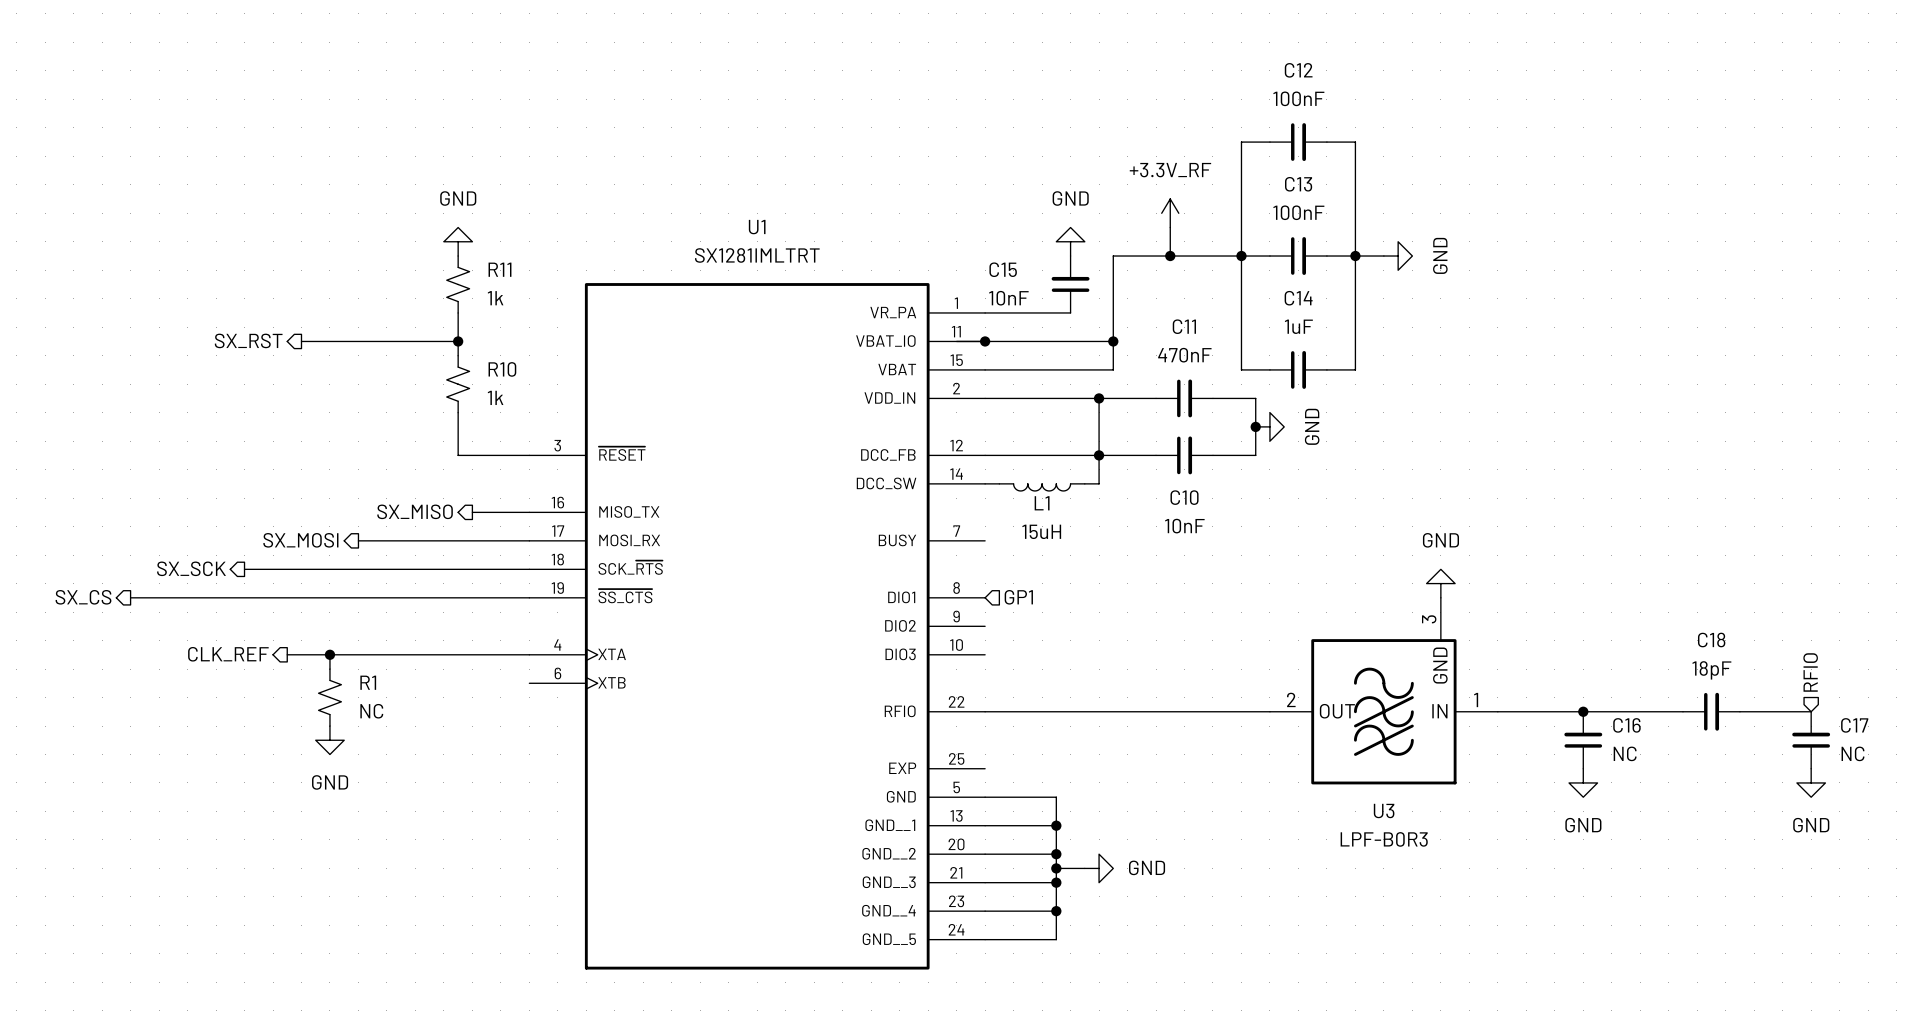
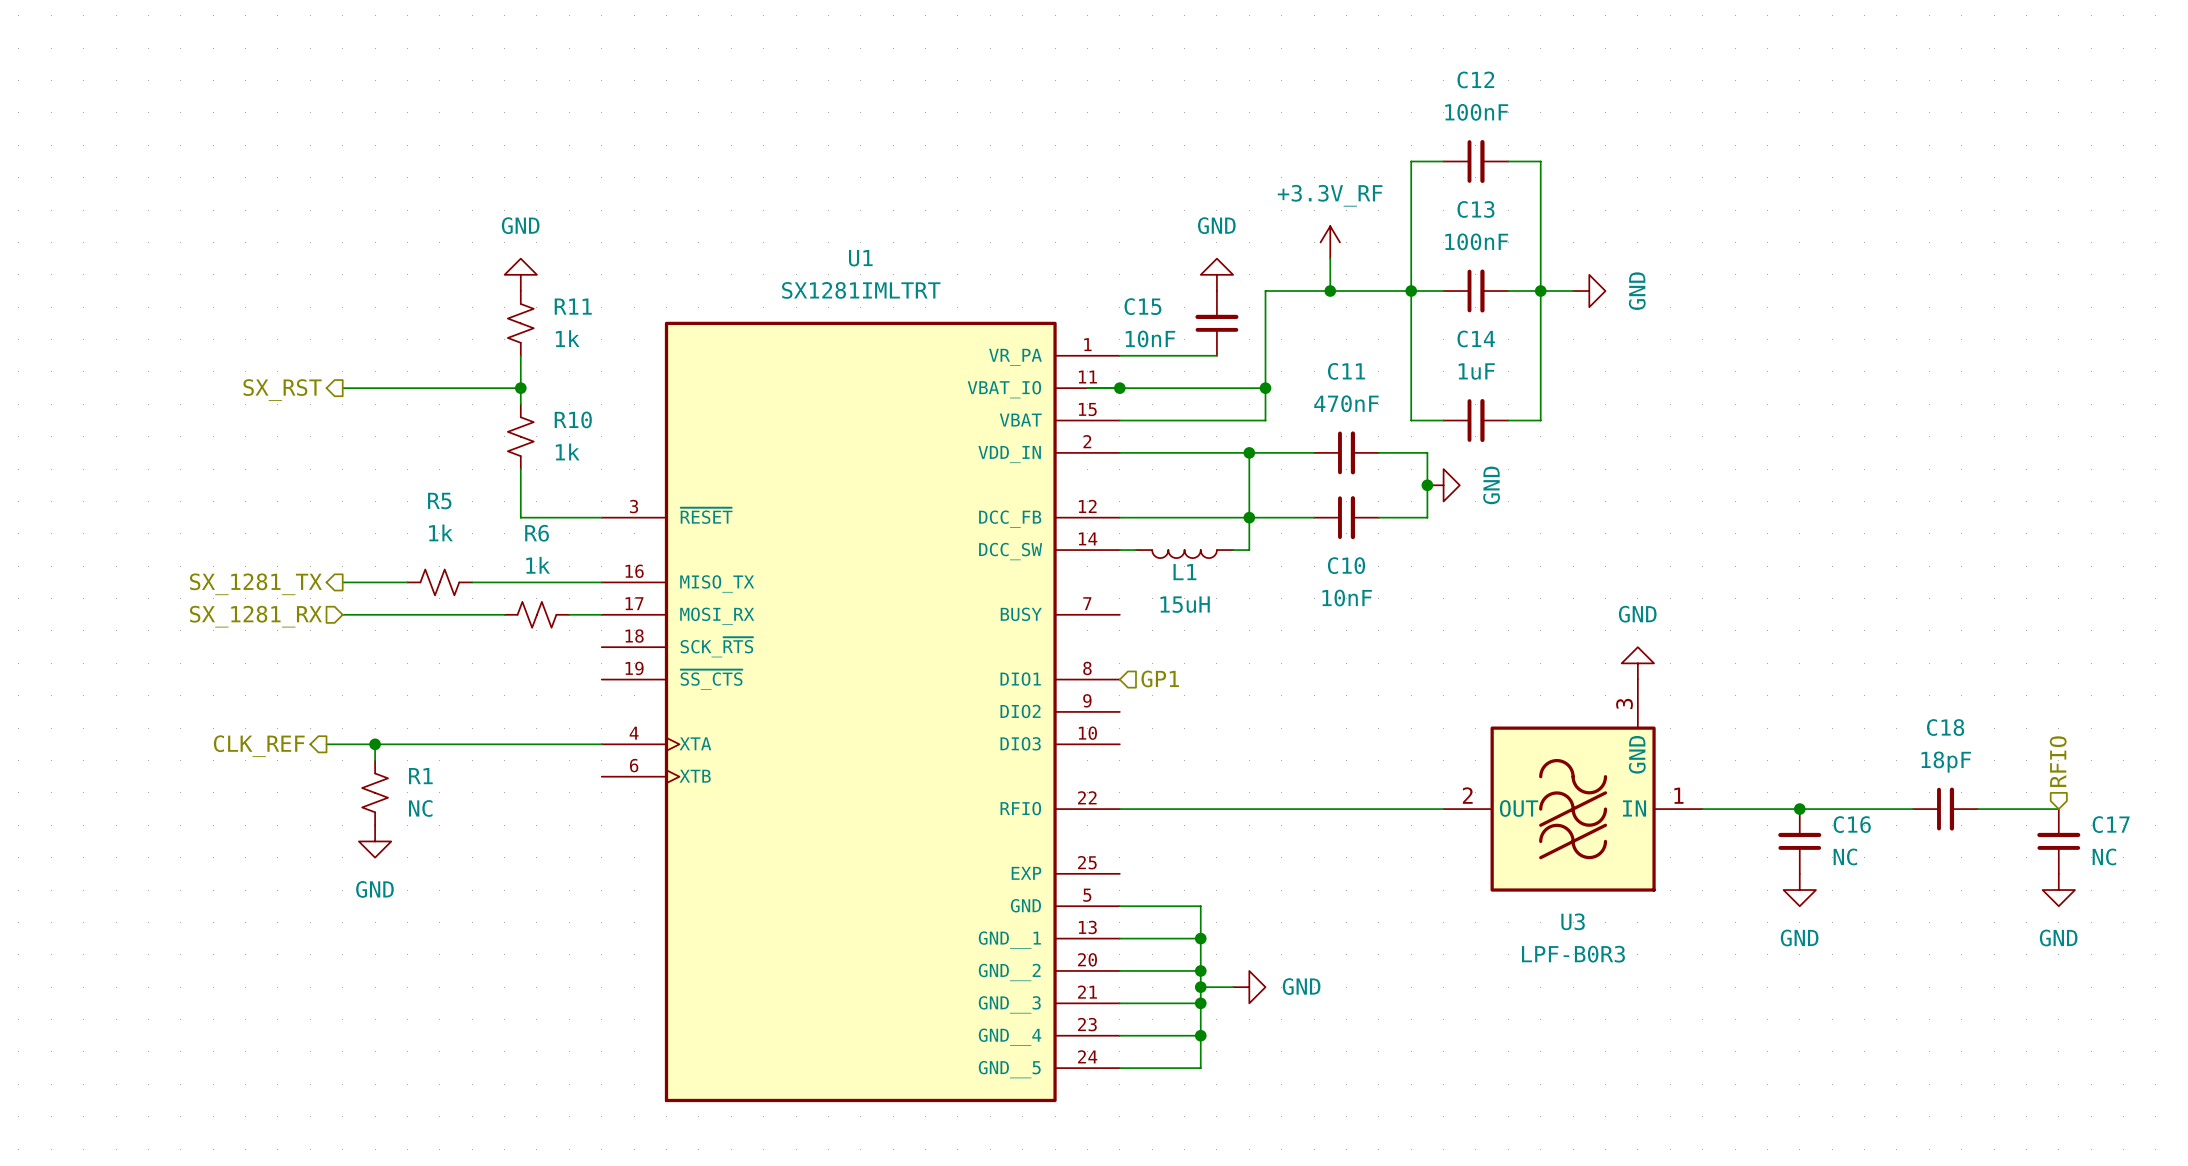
hierarchical label: none -> SX_1281_TX (255, 584)
hierarchical label: SX_MISO (415, 511) -> none
wire: none -> (342, 582) (407, 582)
R5: none -> 1k (439, 582)
hierarchical label: none -> SX_1281_RX (255, 616)
hierarchical label: SX_MOSI (300, 540) -> none
wire: none -> (342, 614) (407, 614)
wire: (443, 540) (500, 540) -> (472, 582) (536, 582)
R6: none -> 1k (536, 614)
hierarchical label: SX_SCK (191, 568) -> none
wire: (244, 569) (529, 569) -> none
hierarchical label: SX_CS (83, 597) -> none
wire: (130, 597) (529, 597) -> none

